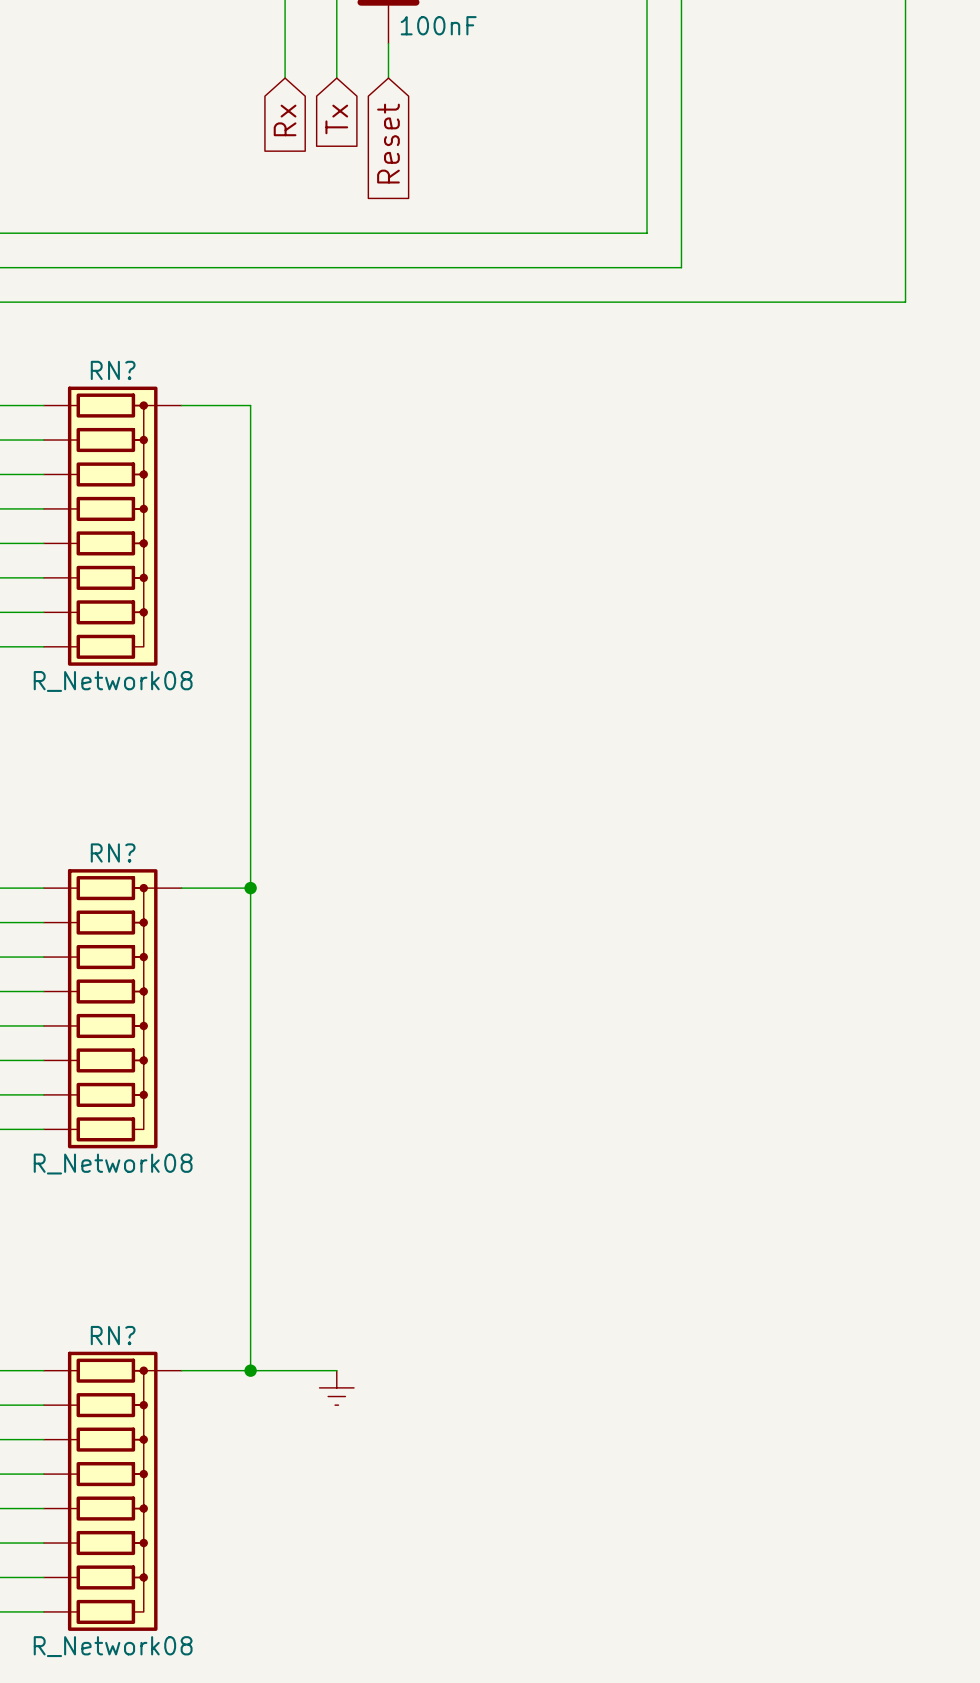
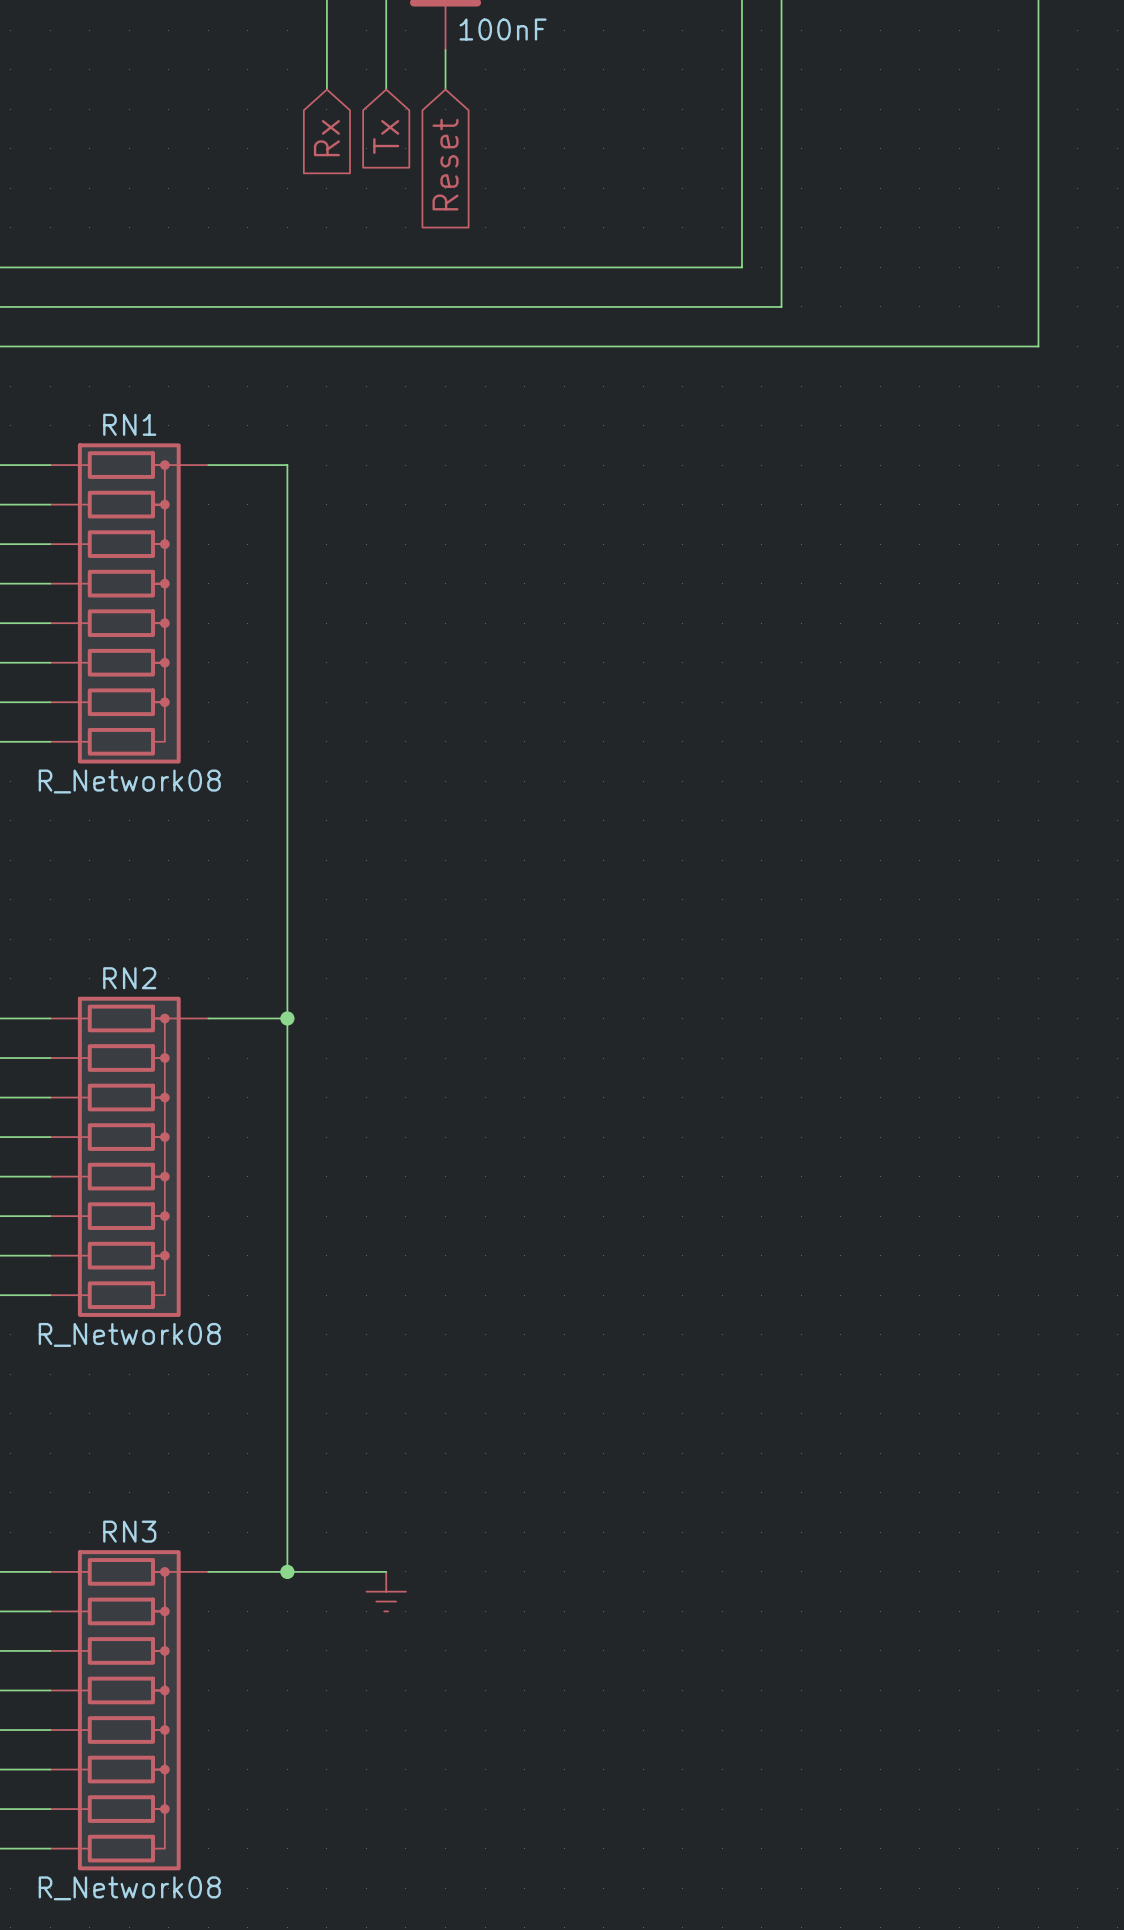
RN? name: RN? (113, 370) -> RN1 (129, 424)
RN? name: RN? (113, 852) -> RN2 (129, 978)
RN? name: RN? (113, 1335) -> RN3 (129, 1531)

